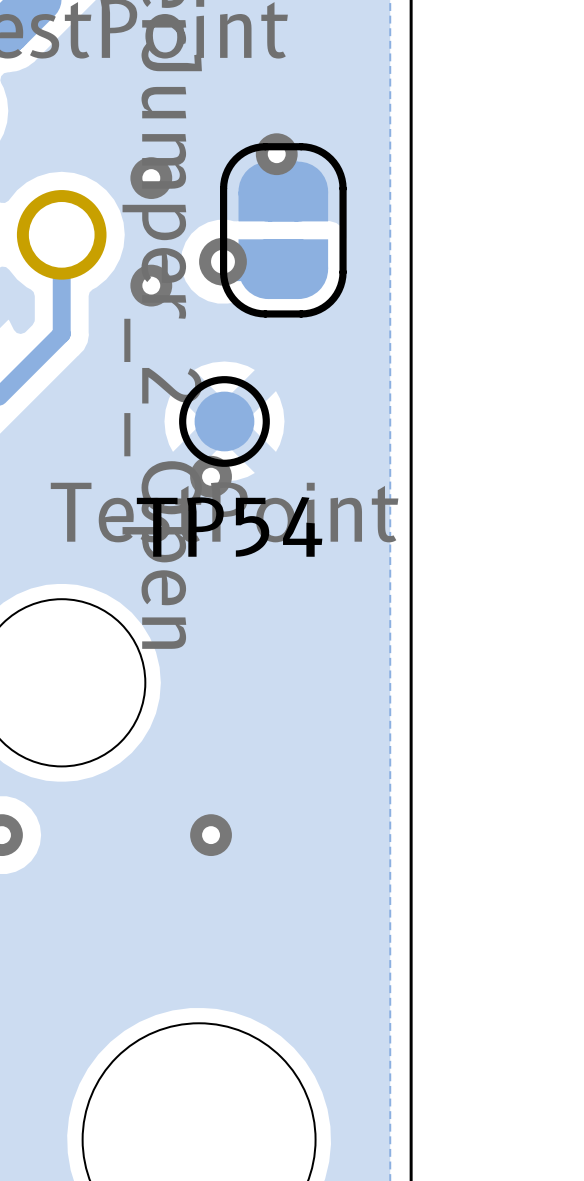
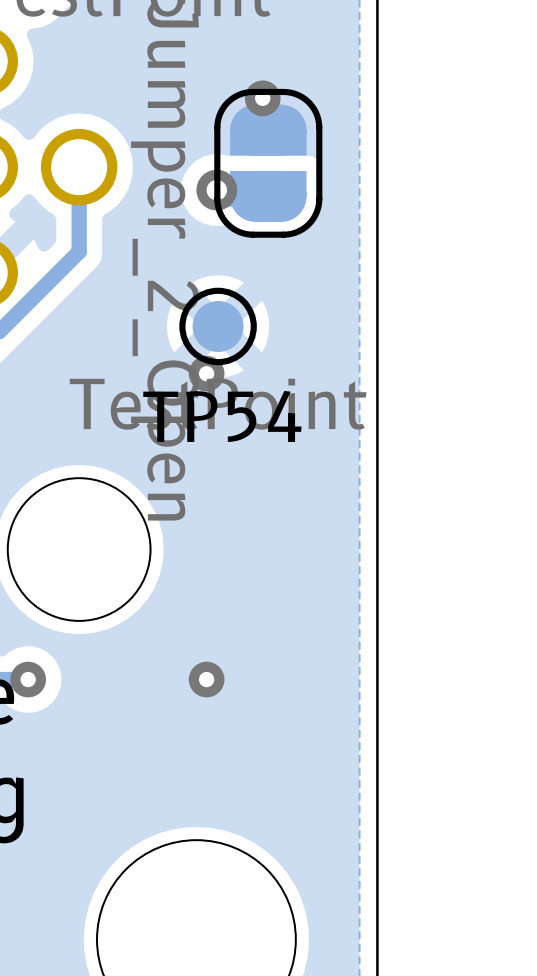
via: (151, 178) -> none
via: (151, 285) -> none

